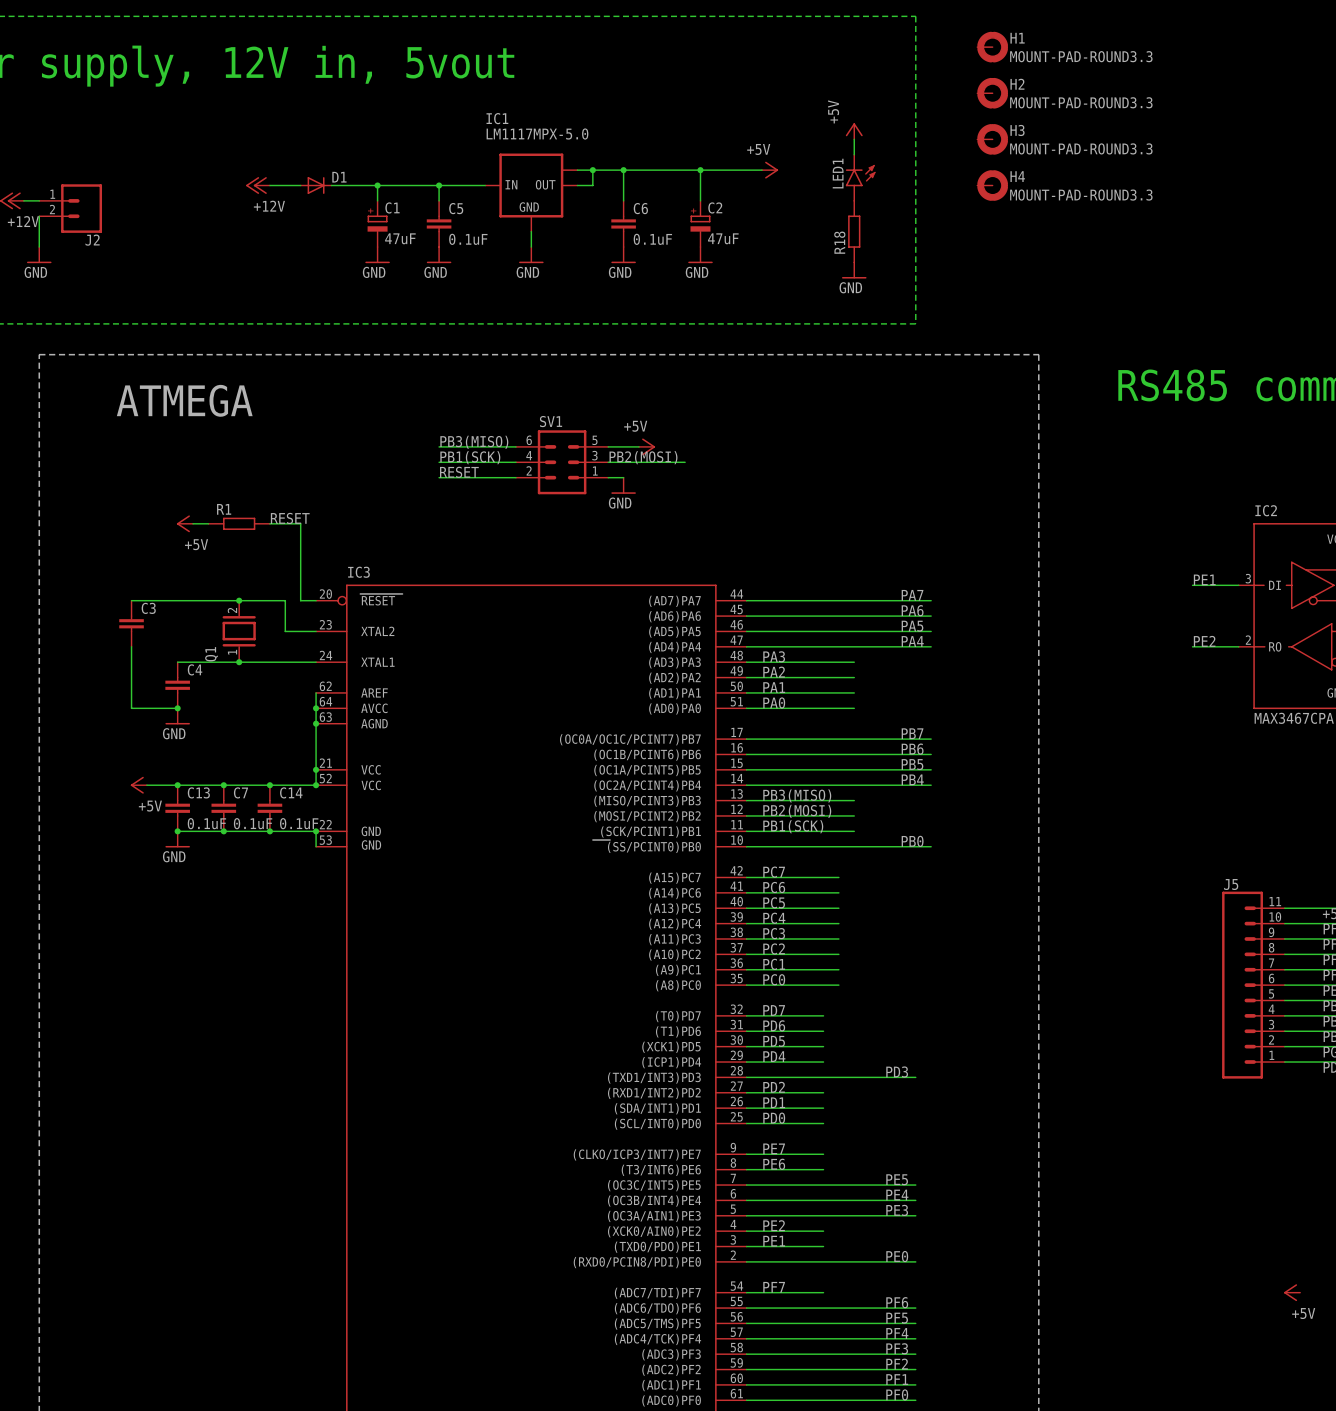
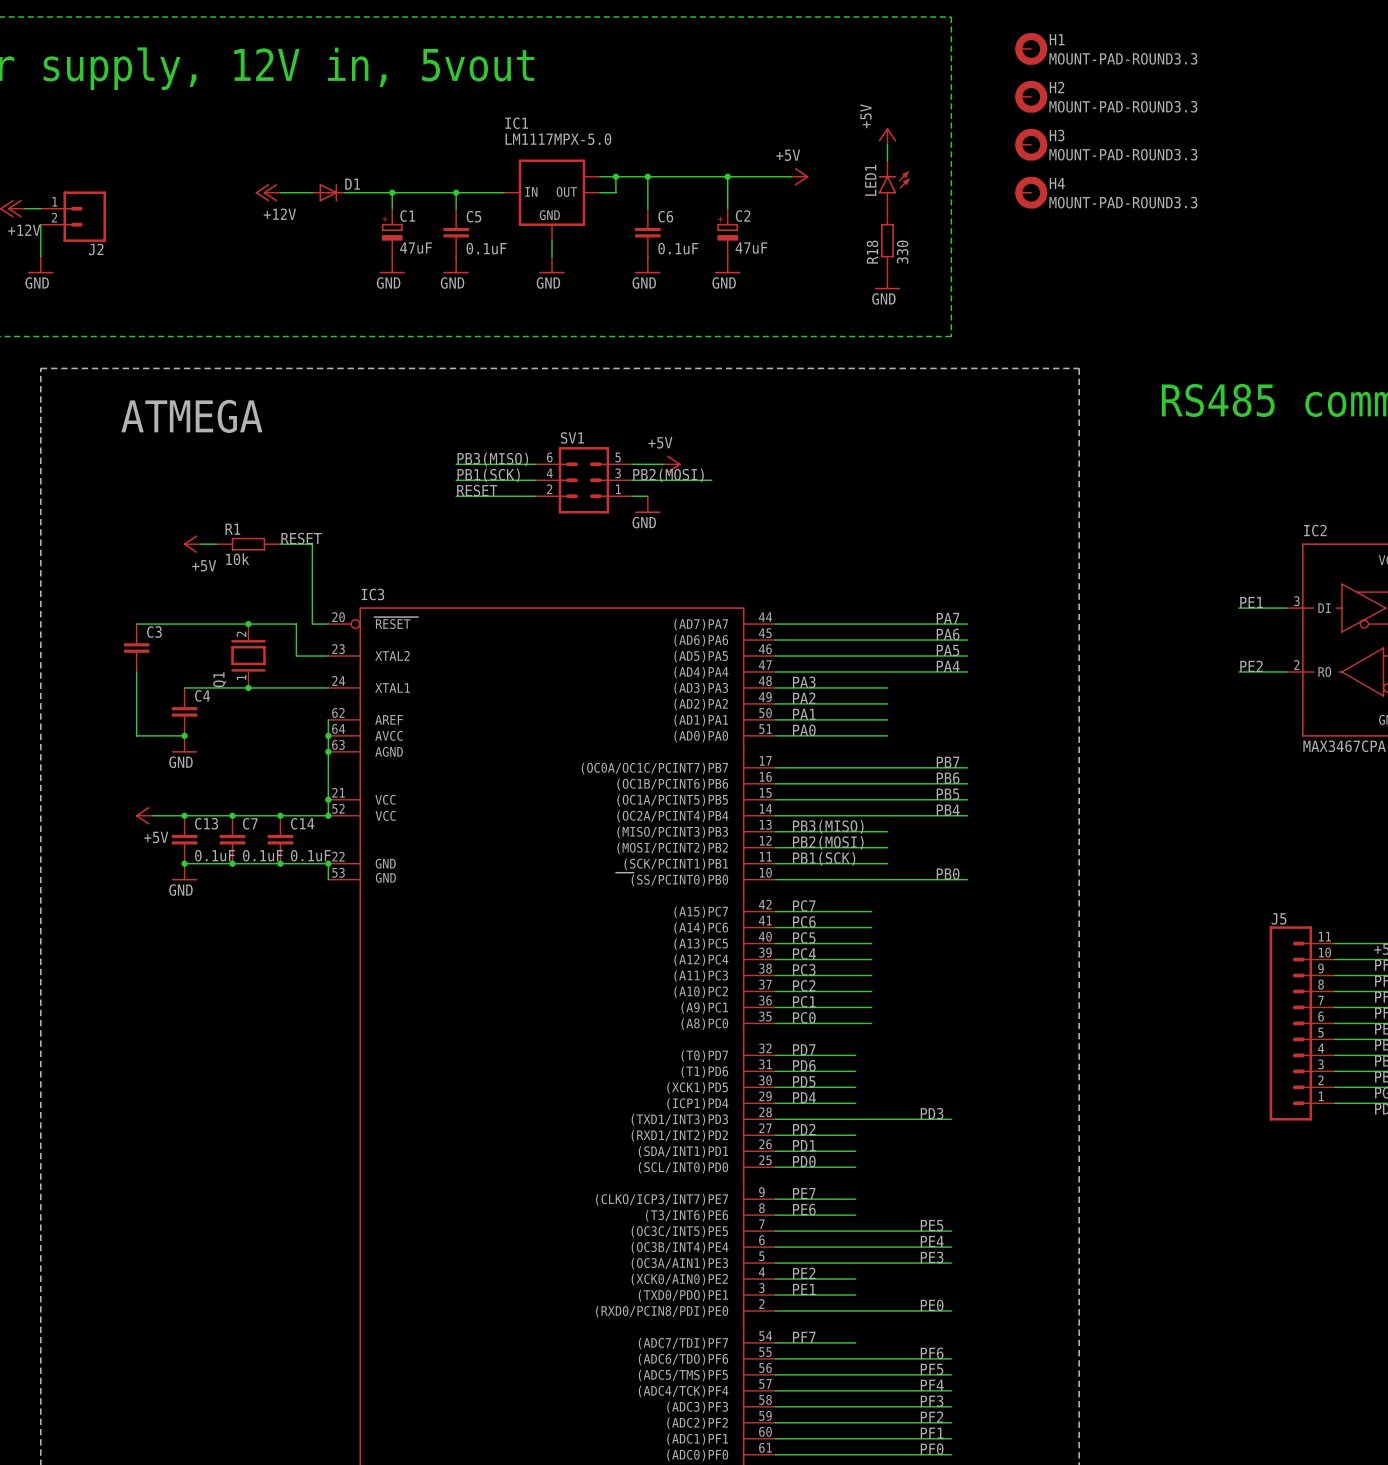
R18 value: none -> 330 (902, 252)
R1 value: none -> 10k (237, 559)
power symbol: +5V (1292, 1292) -> none

